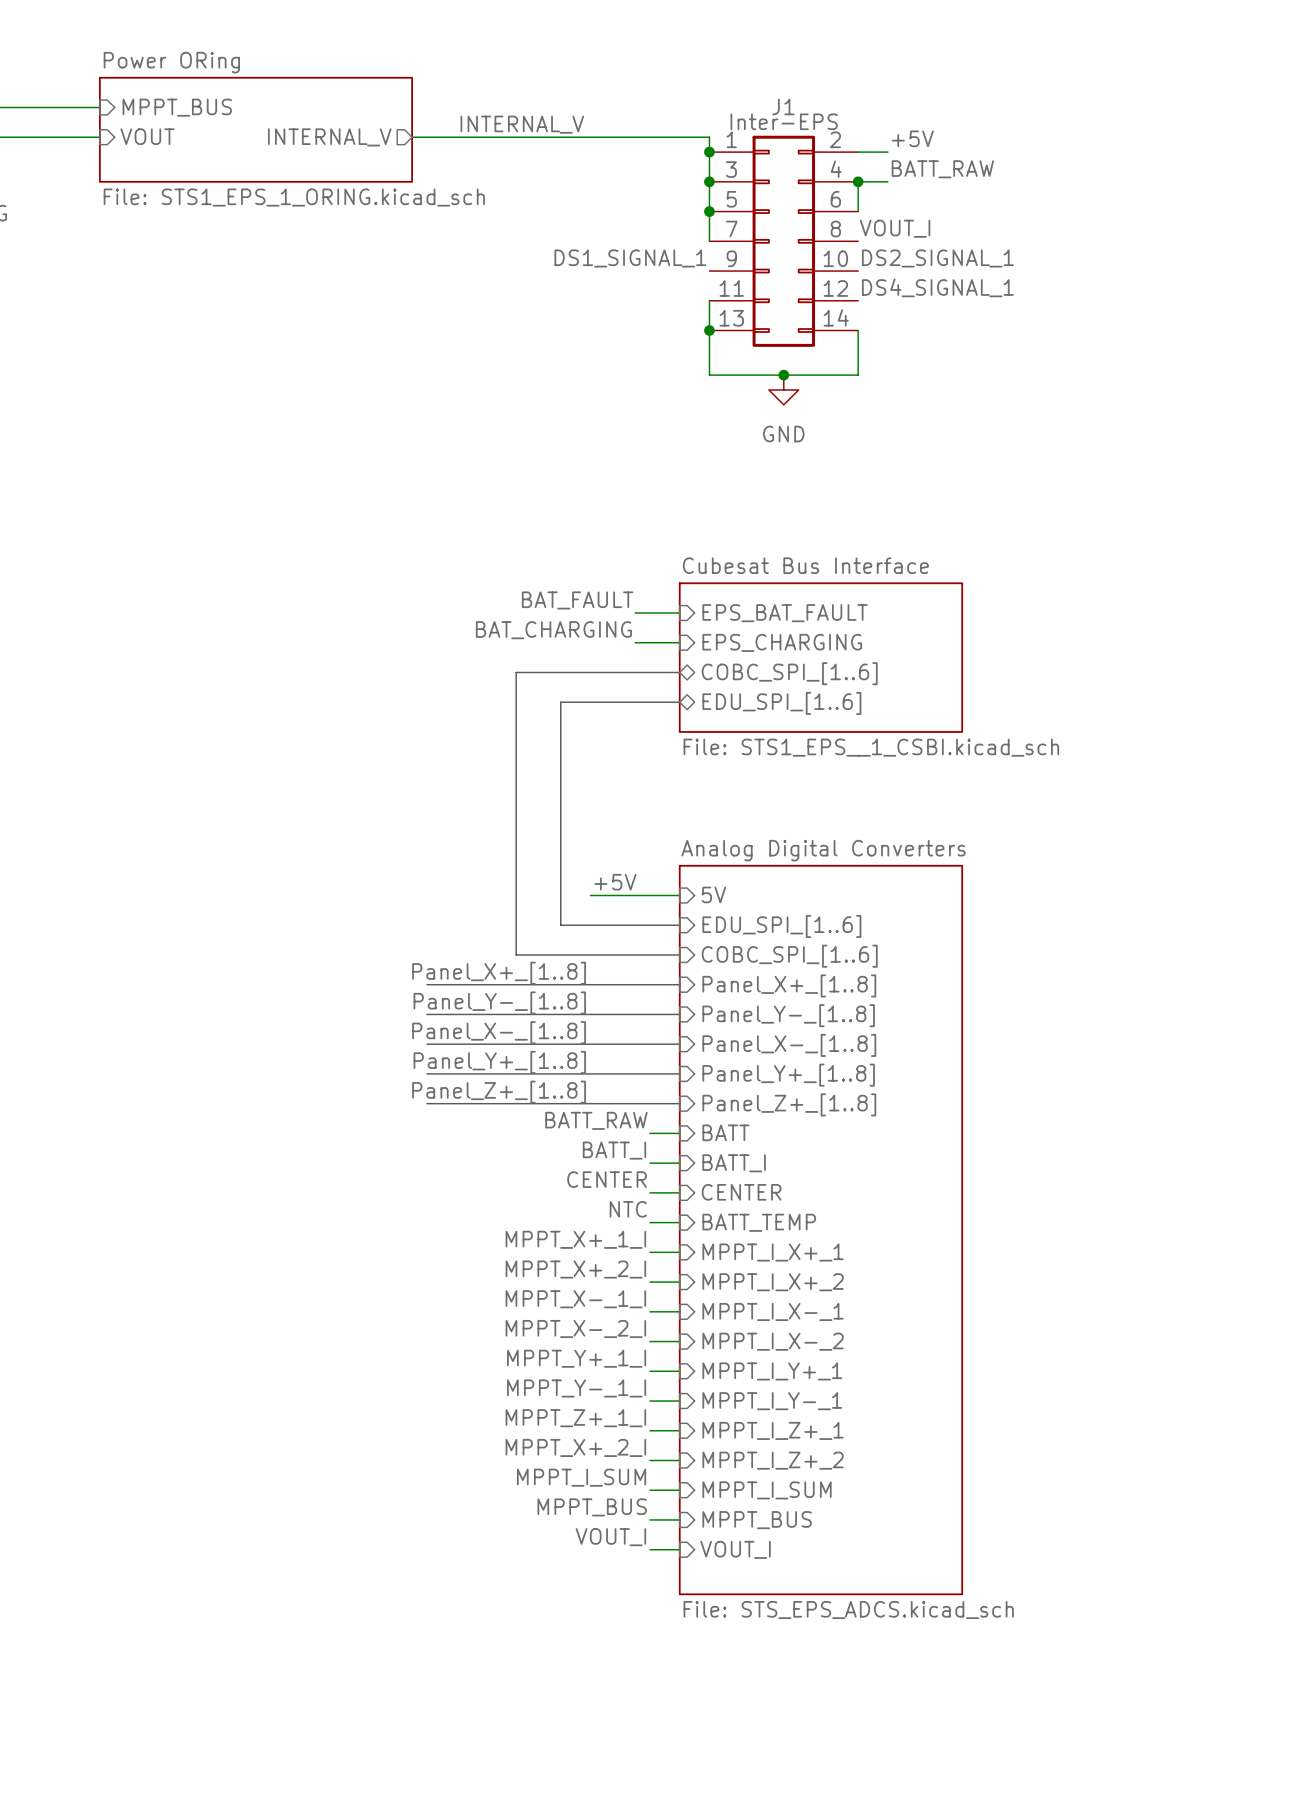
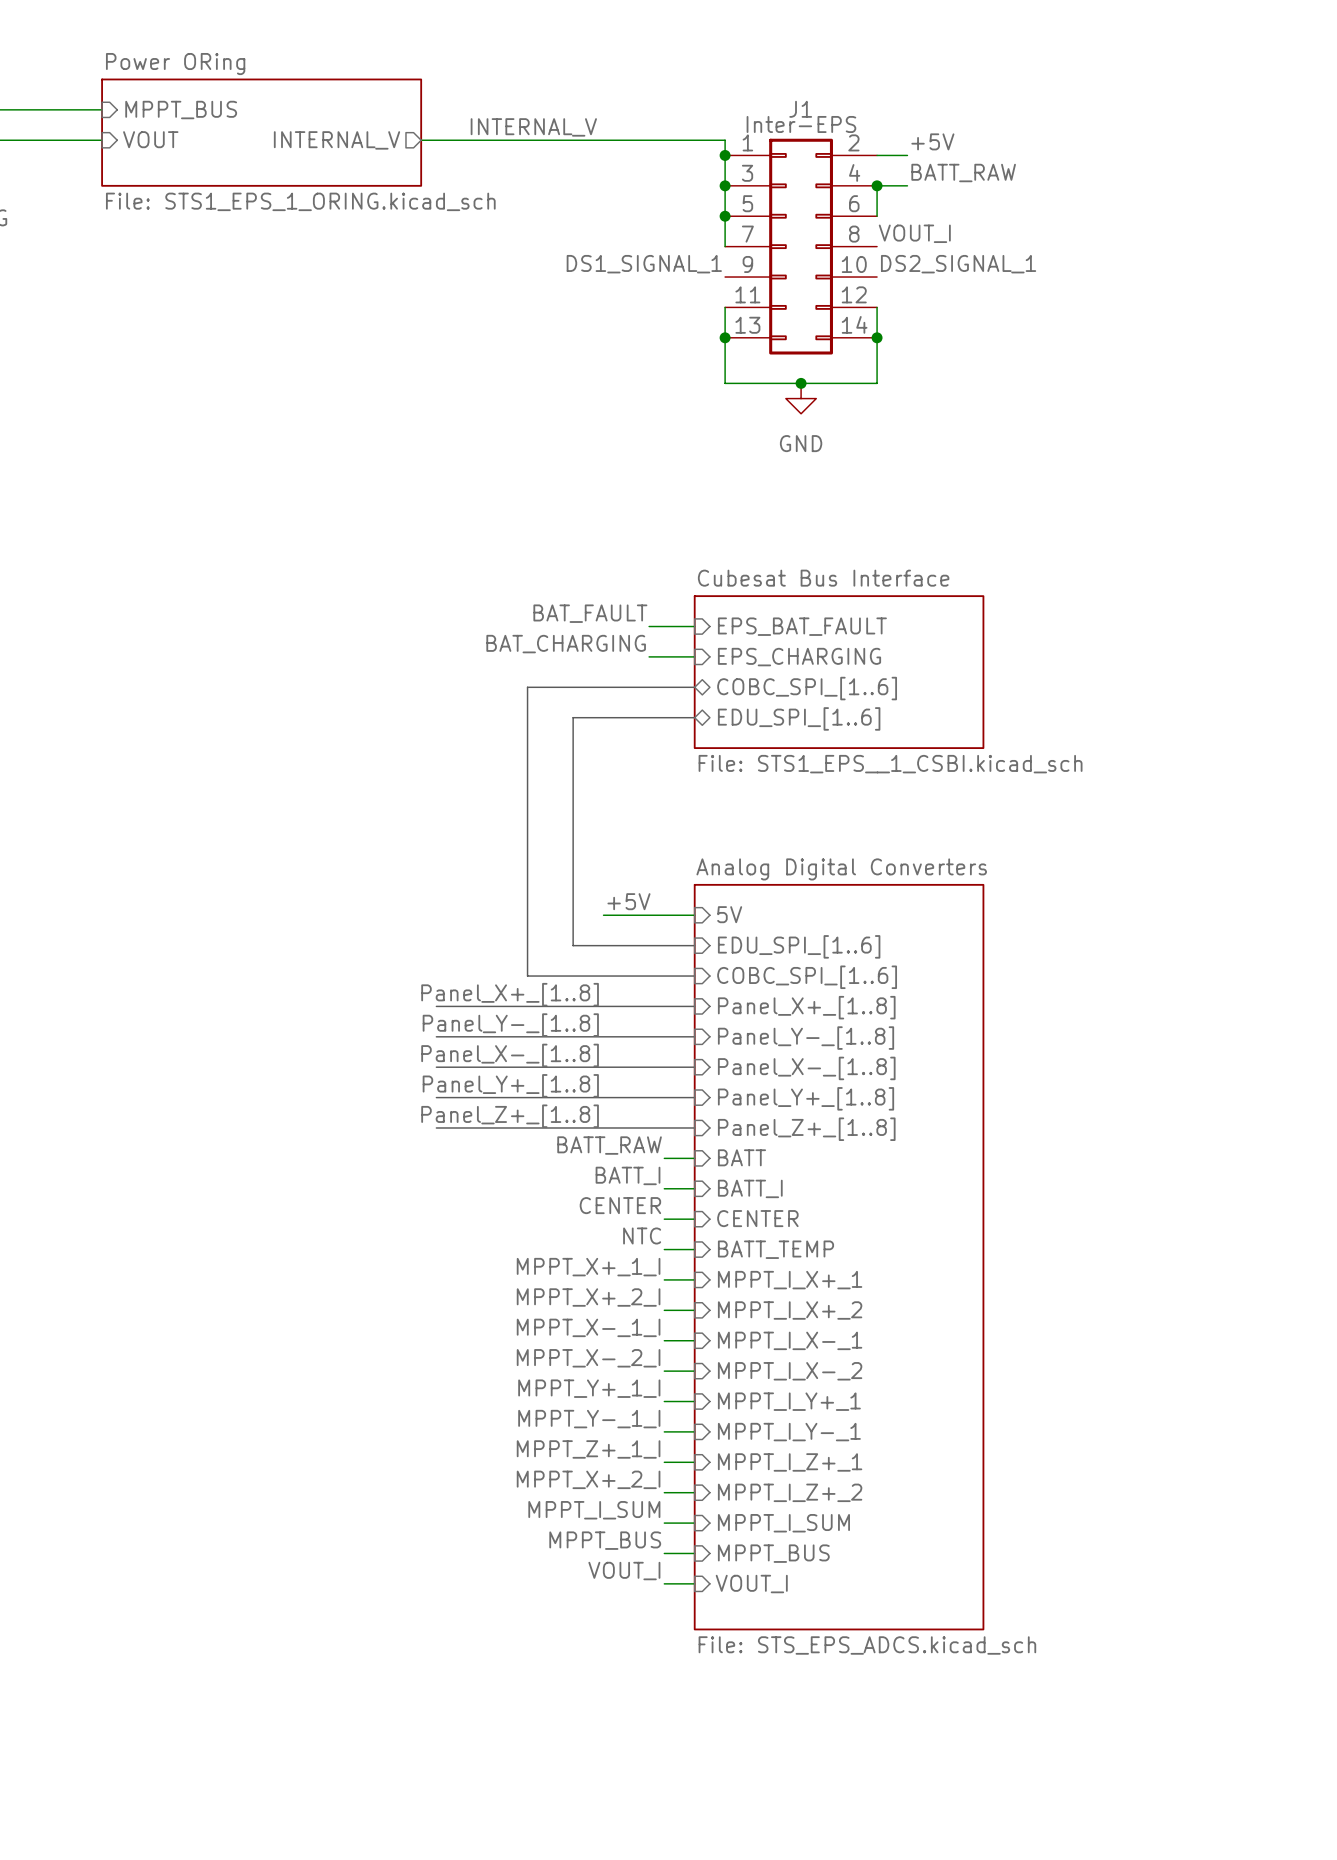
label: DS4_SIGNAL_1 (937, 287) -> none
wire: none -> (877, 307) (877, 337)
junction: none -> (877, 337)

